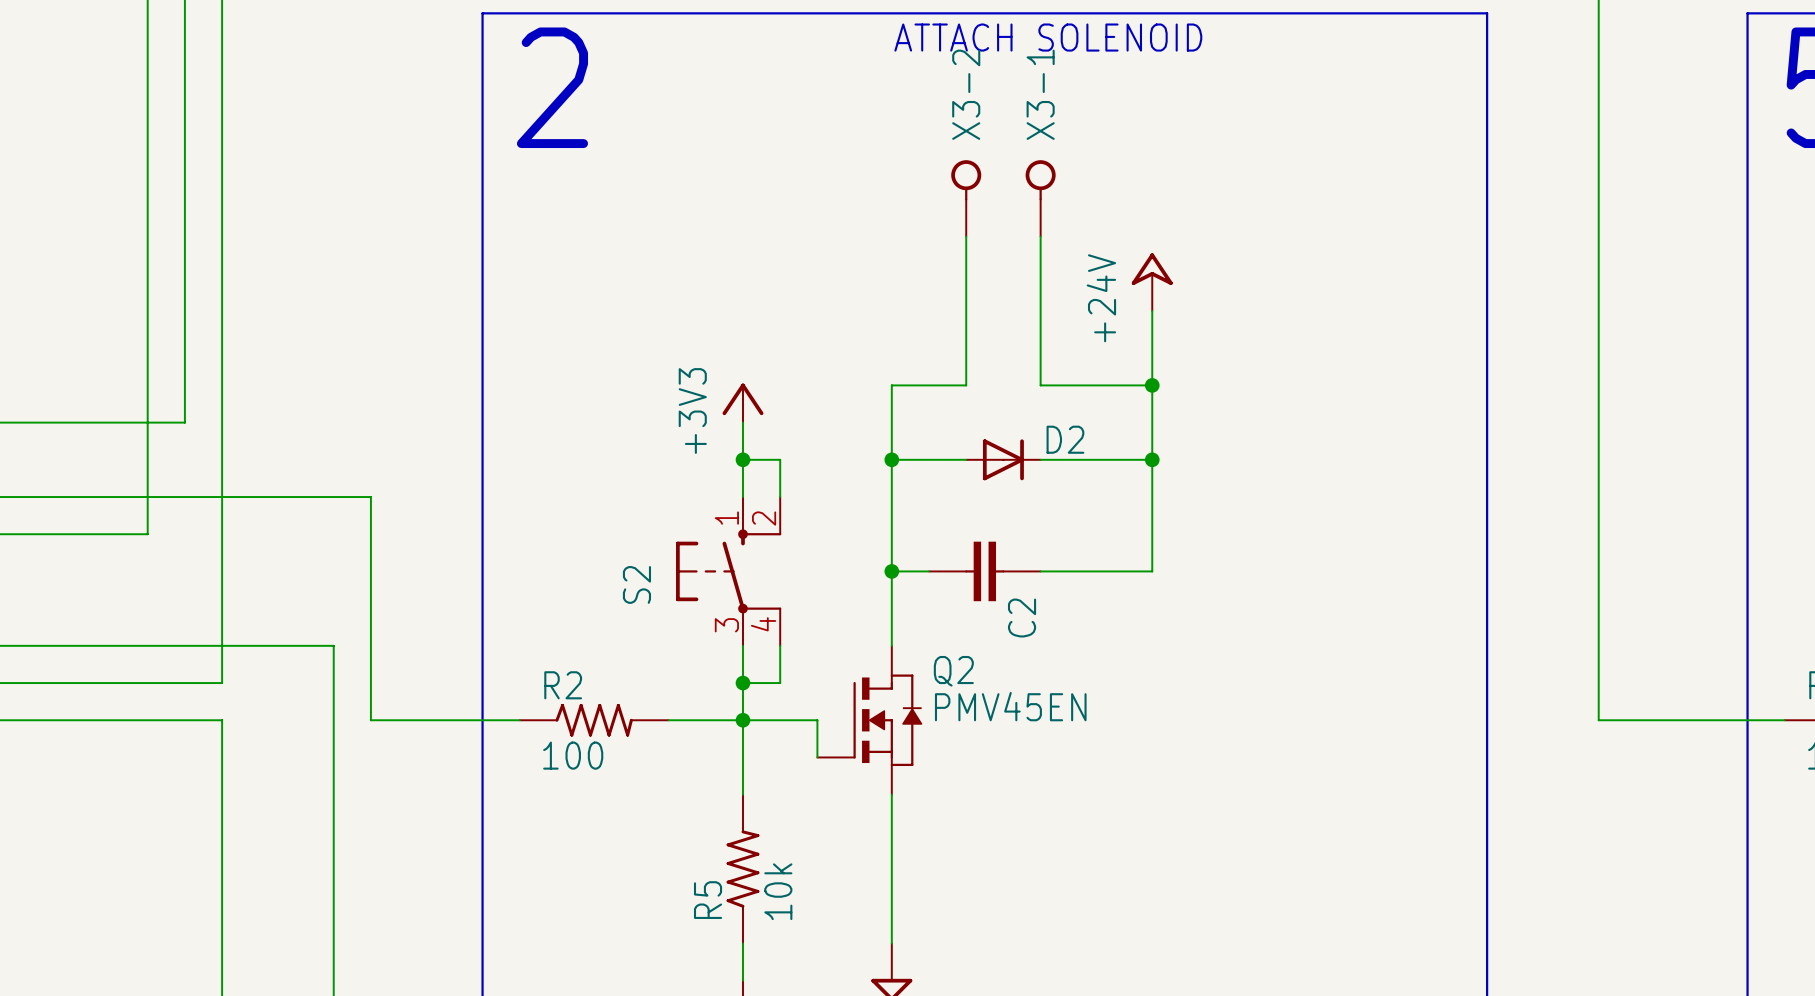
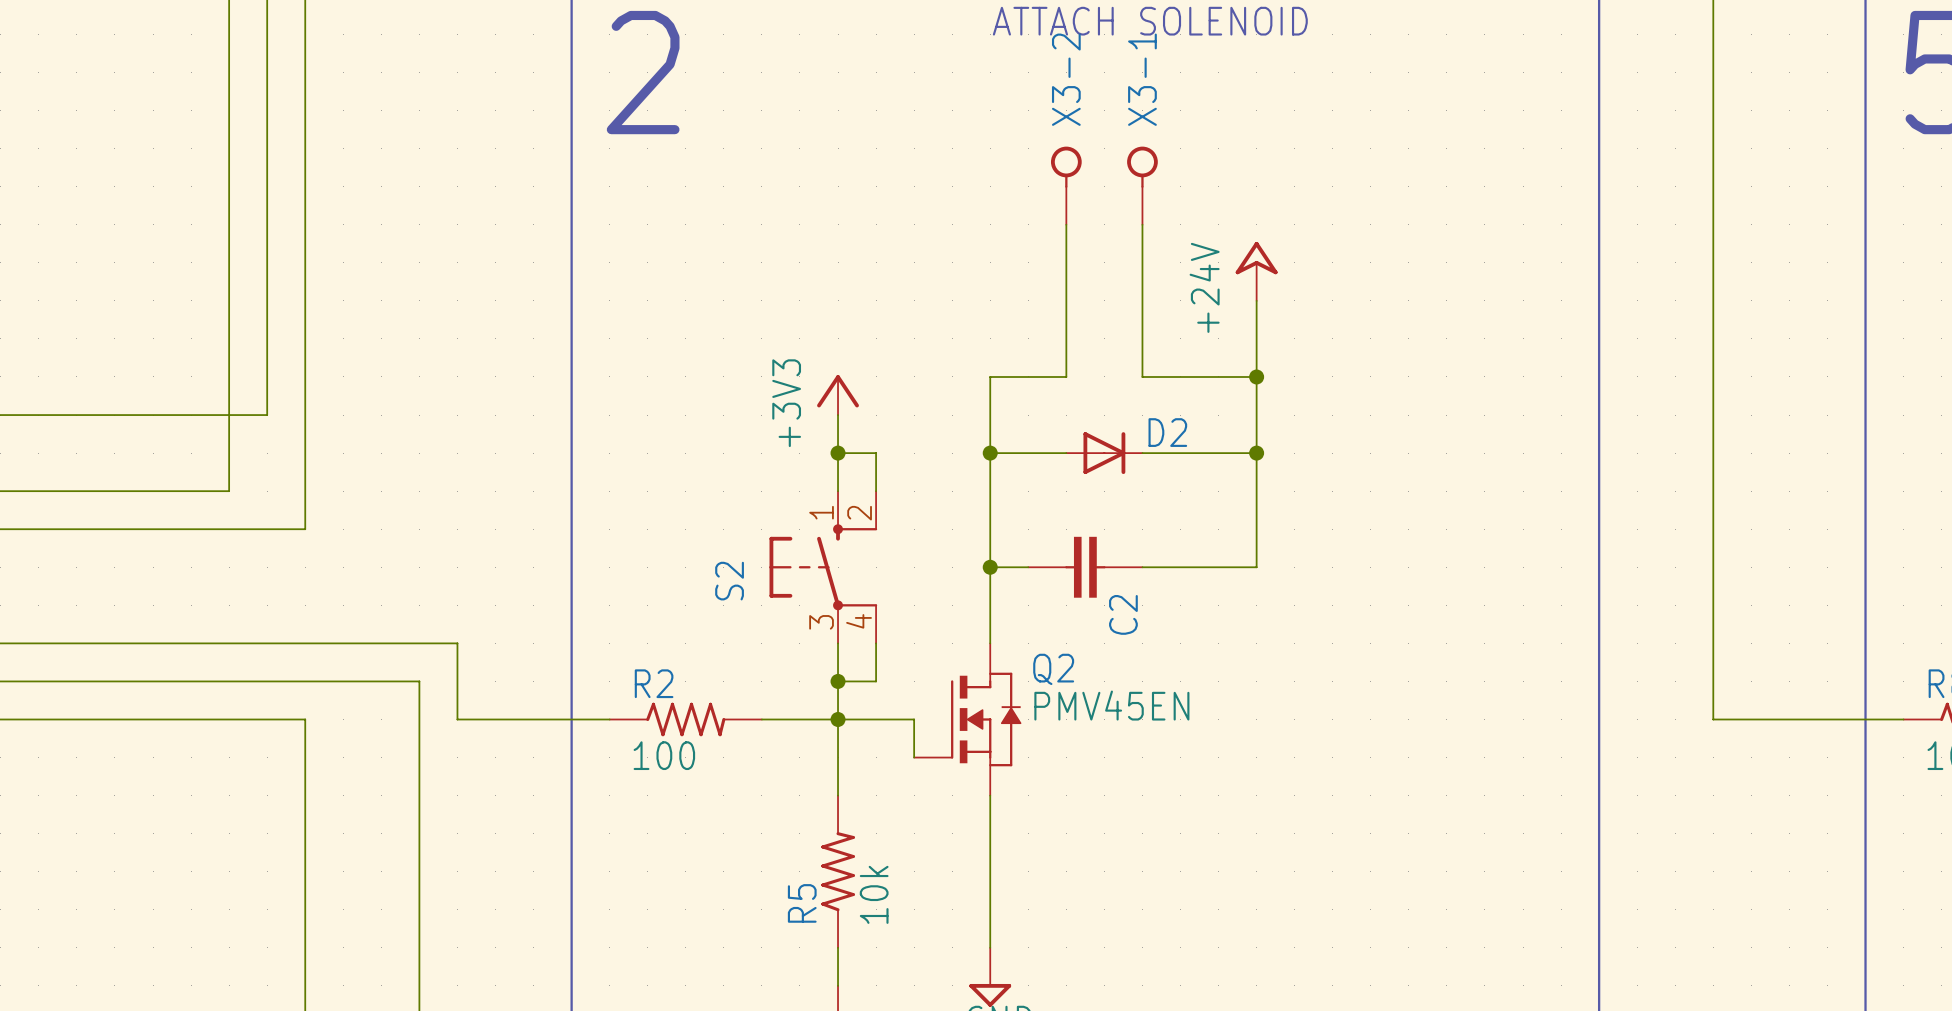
wire: (147, 534) (147, 497) (370, 497) (370, 645) -> none
wire: (222, 534) (222, 683) -> (305, 529) (229, 529)
wire: (333, 645) (333, 683) -> (419, 643) (457, 643)
wire: none -> (305, 681) (419, 681)

